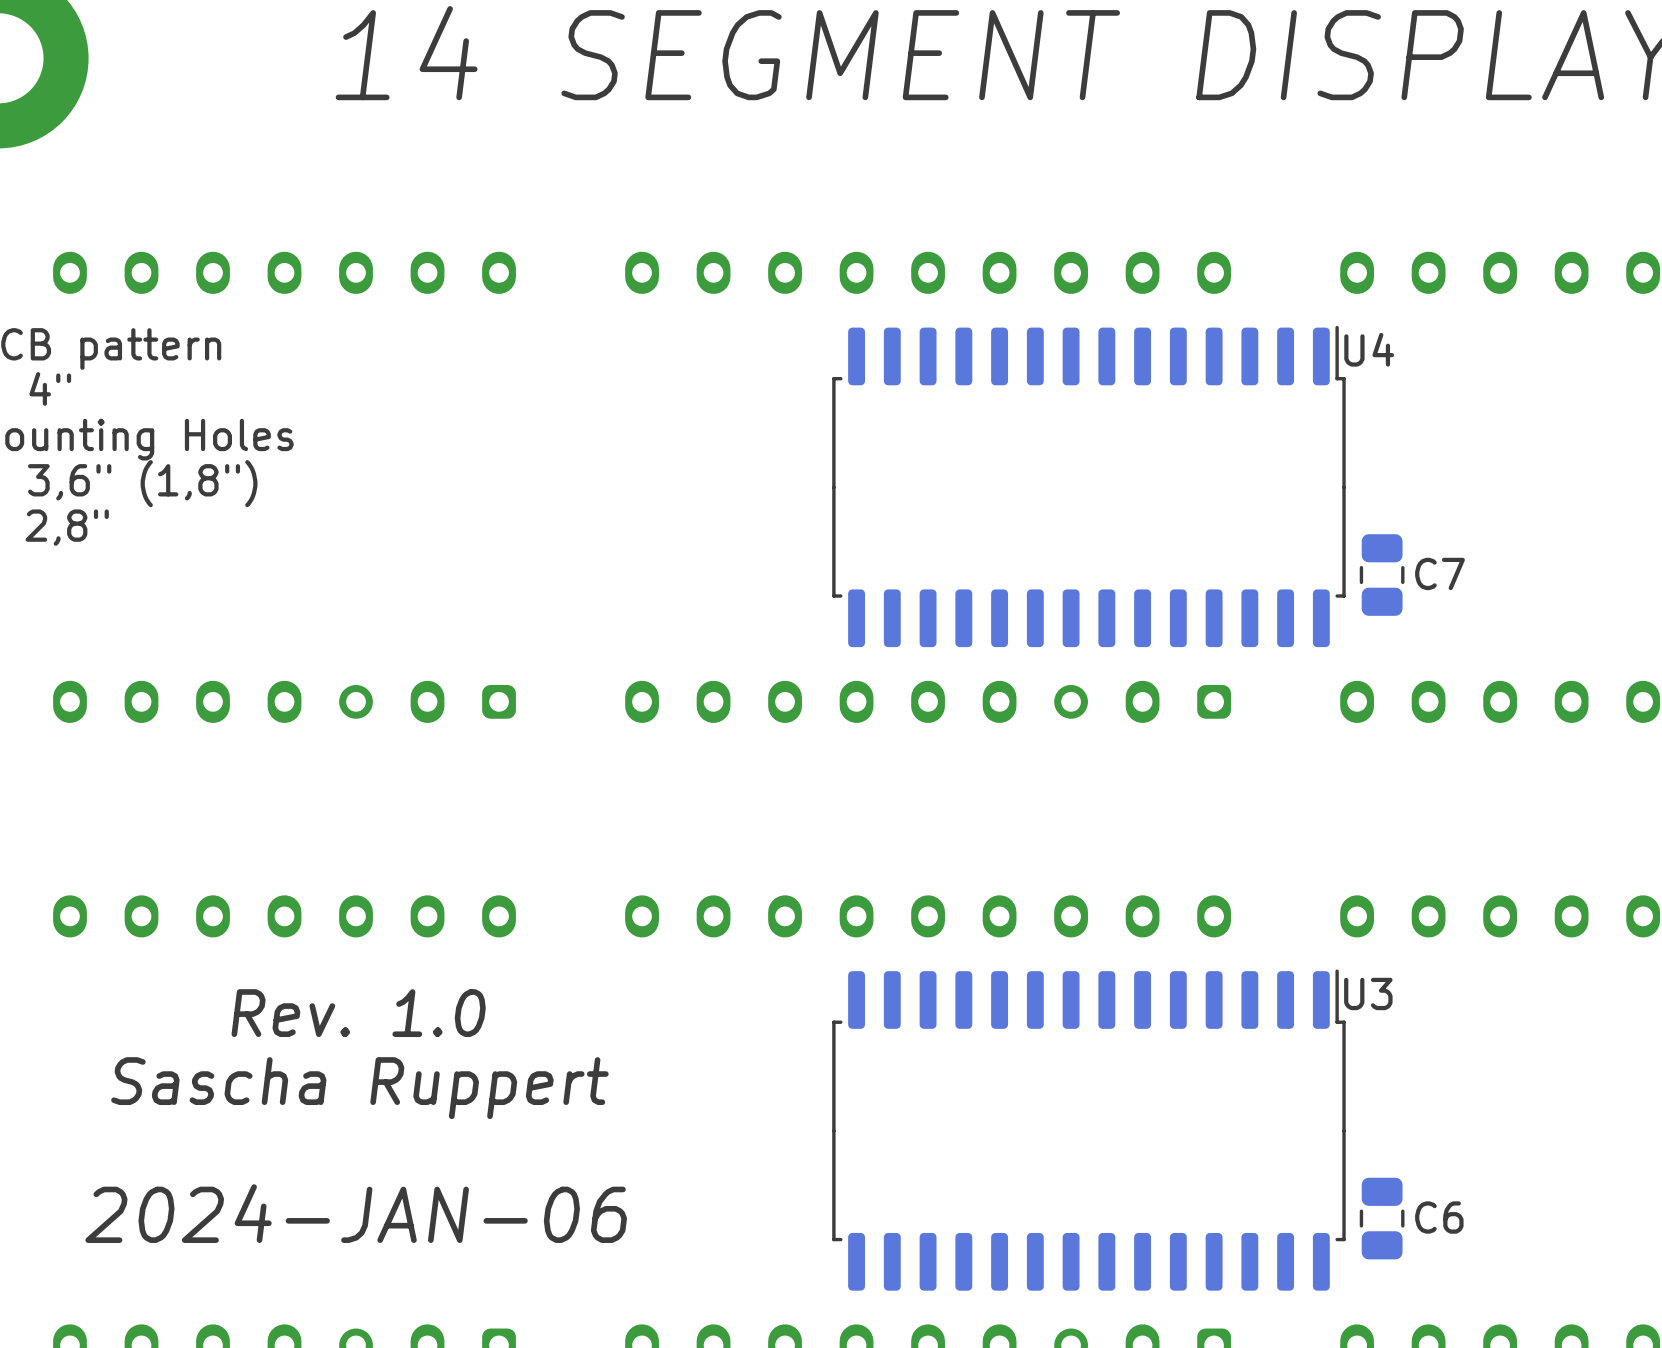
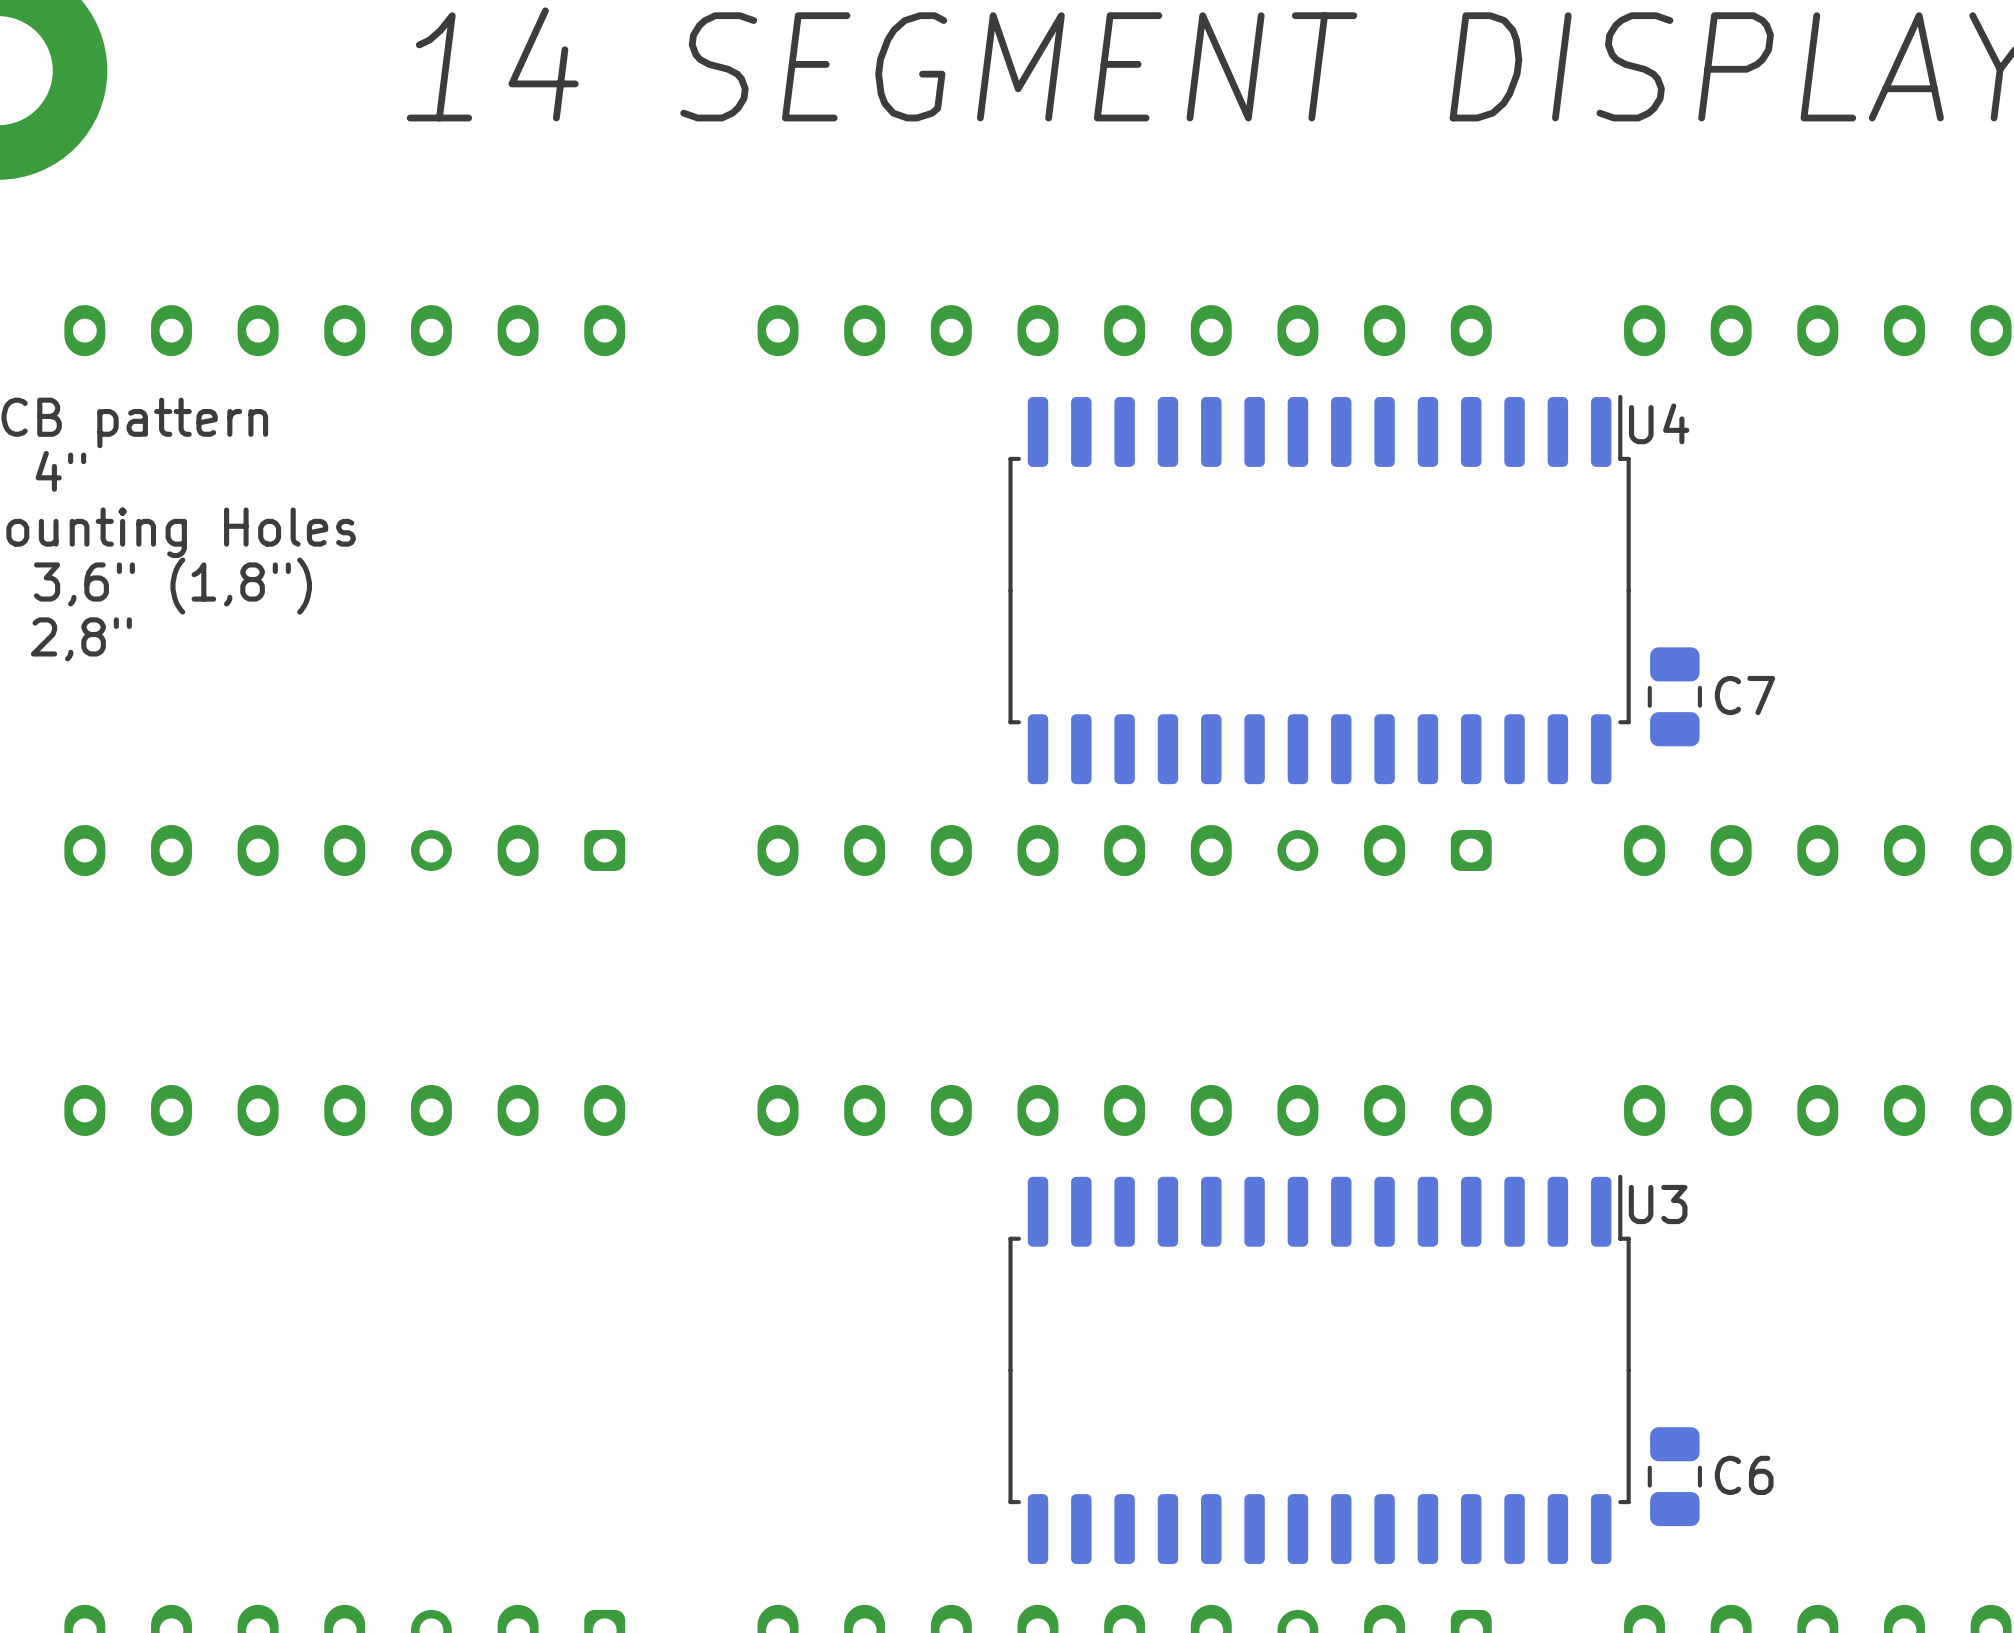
text: Rev. 1.0 (358, 1013) -> none
text: Sascha Ruppert (359, 1088) -> none
text: 2024-JAN-06 (356, 1213) -> none

